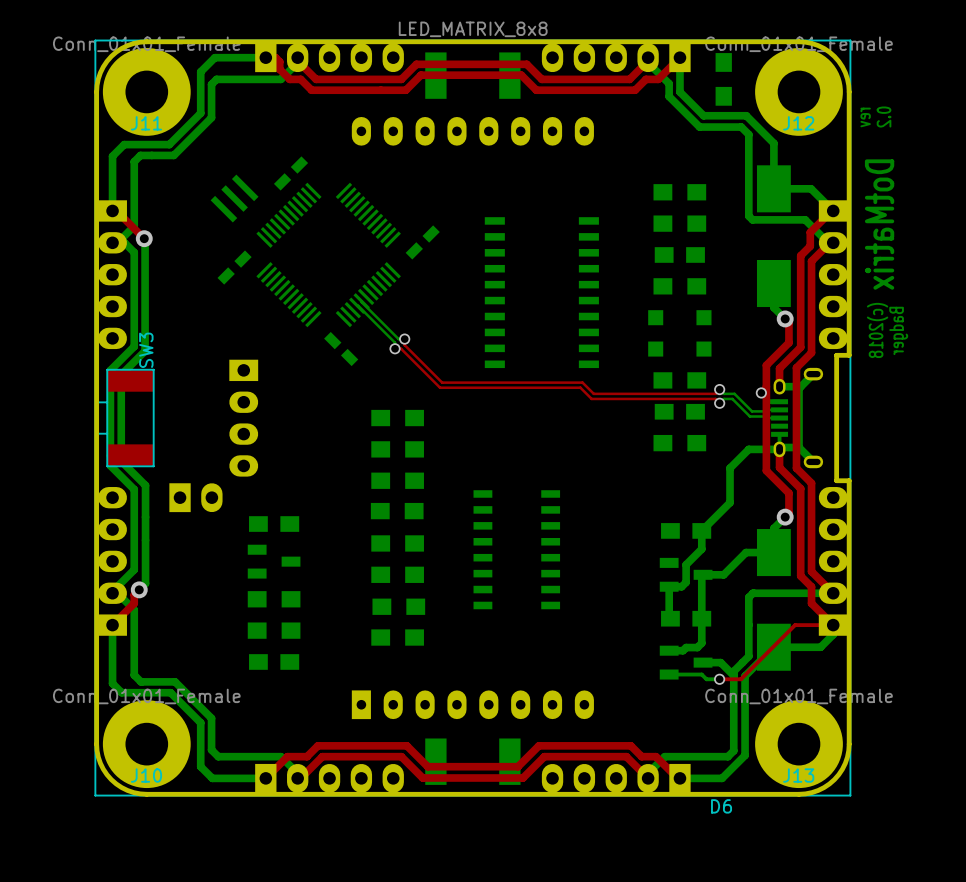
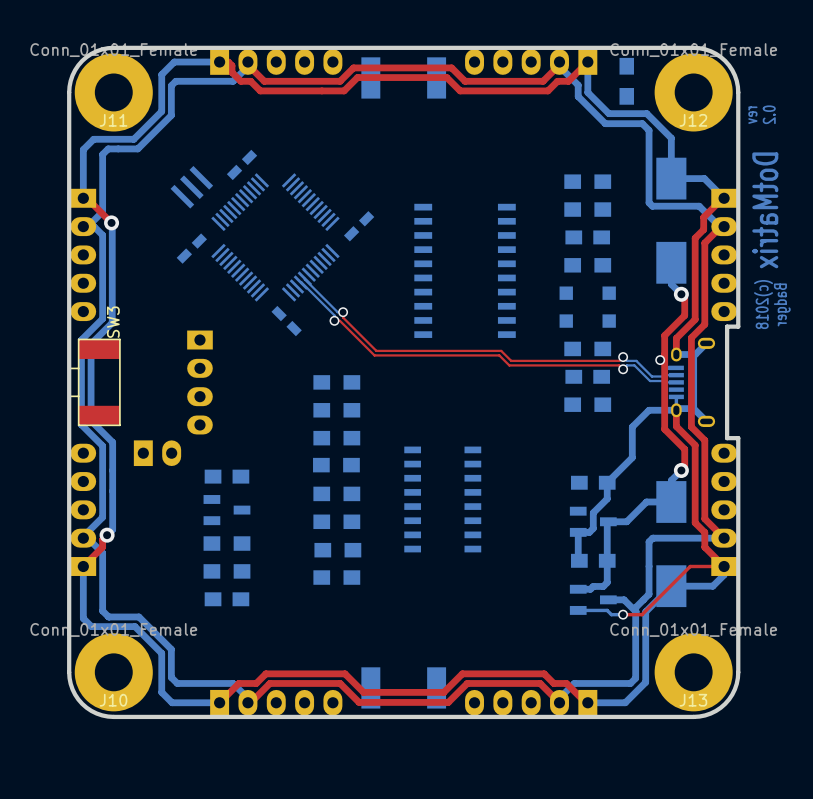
D6: LED_MATRIX_8x8 (472, 418) -> none

